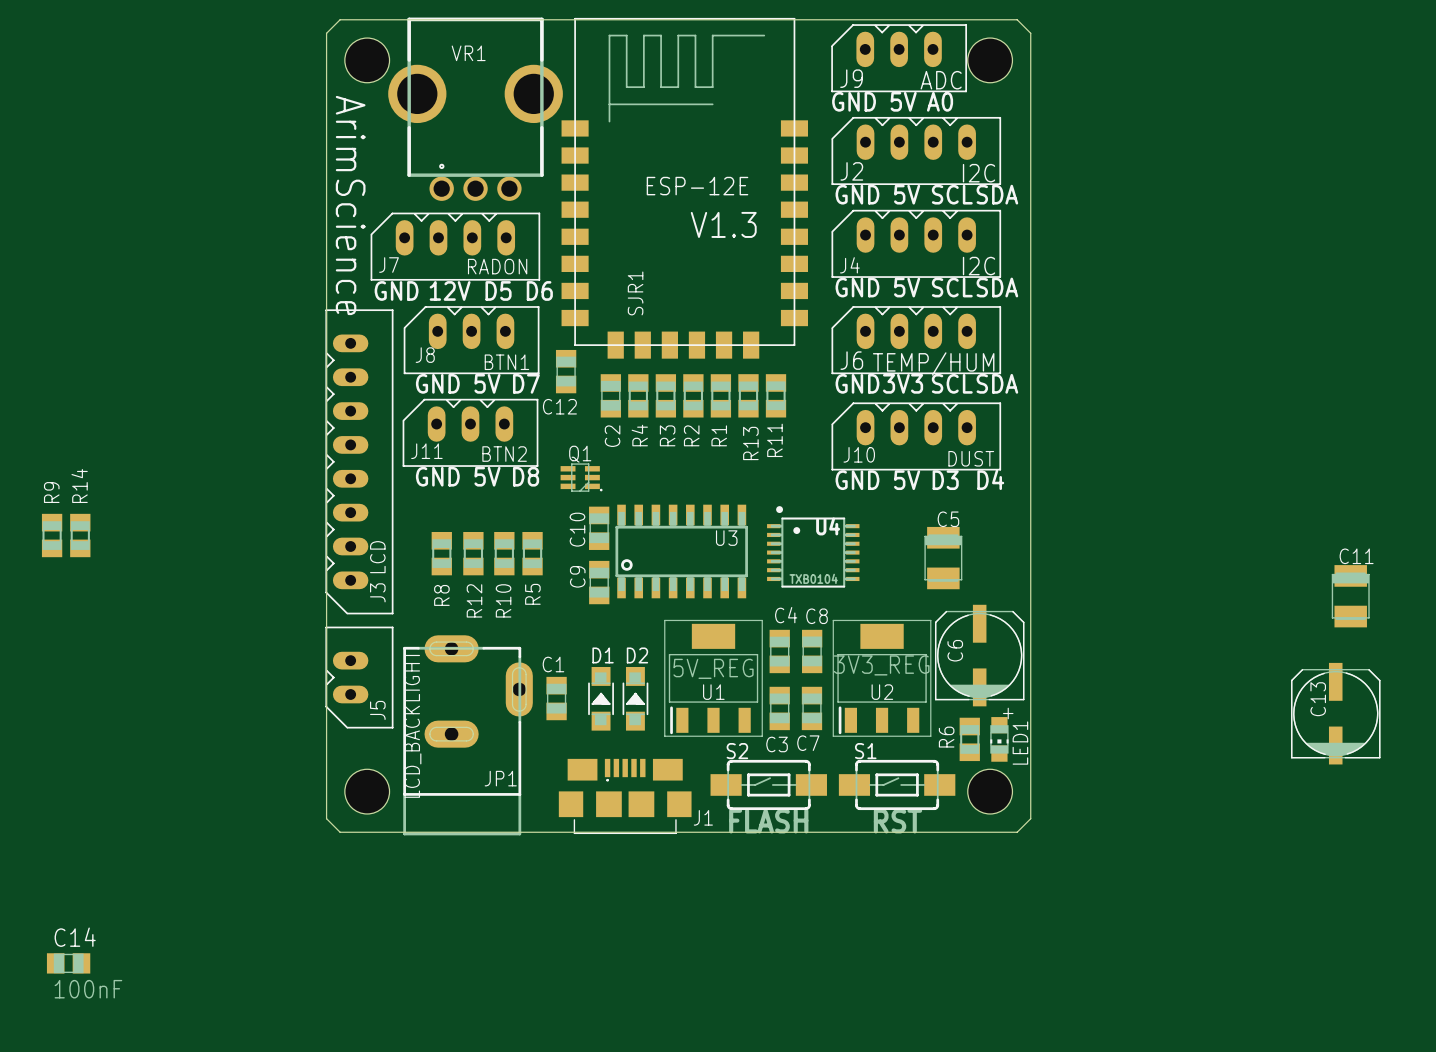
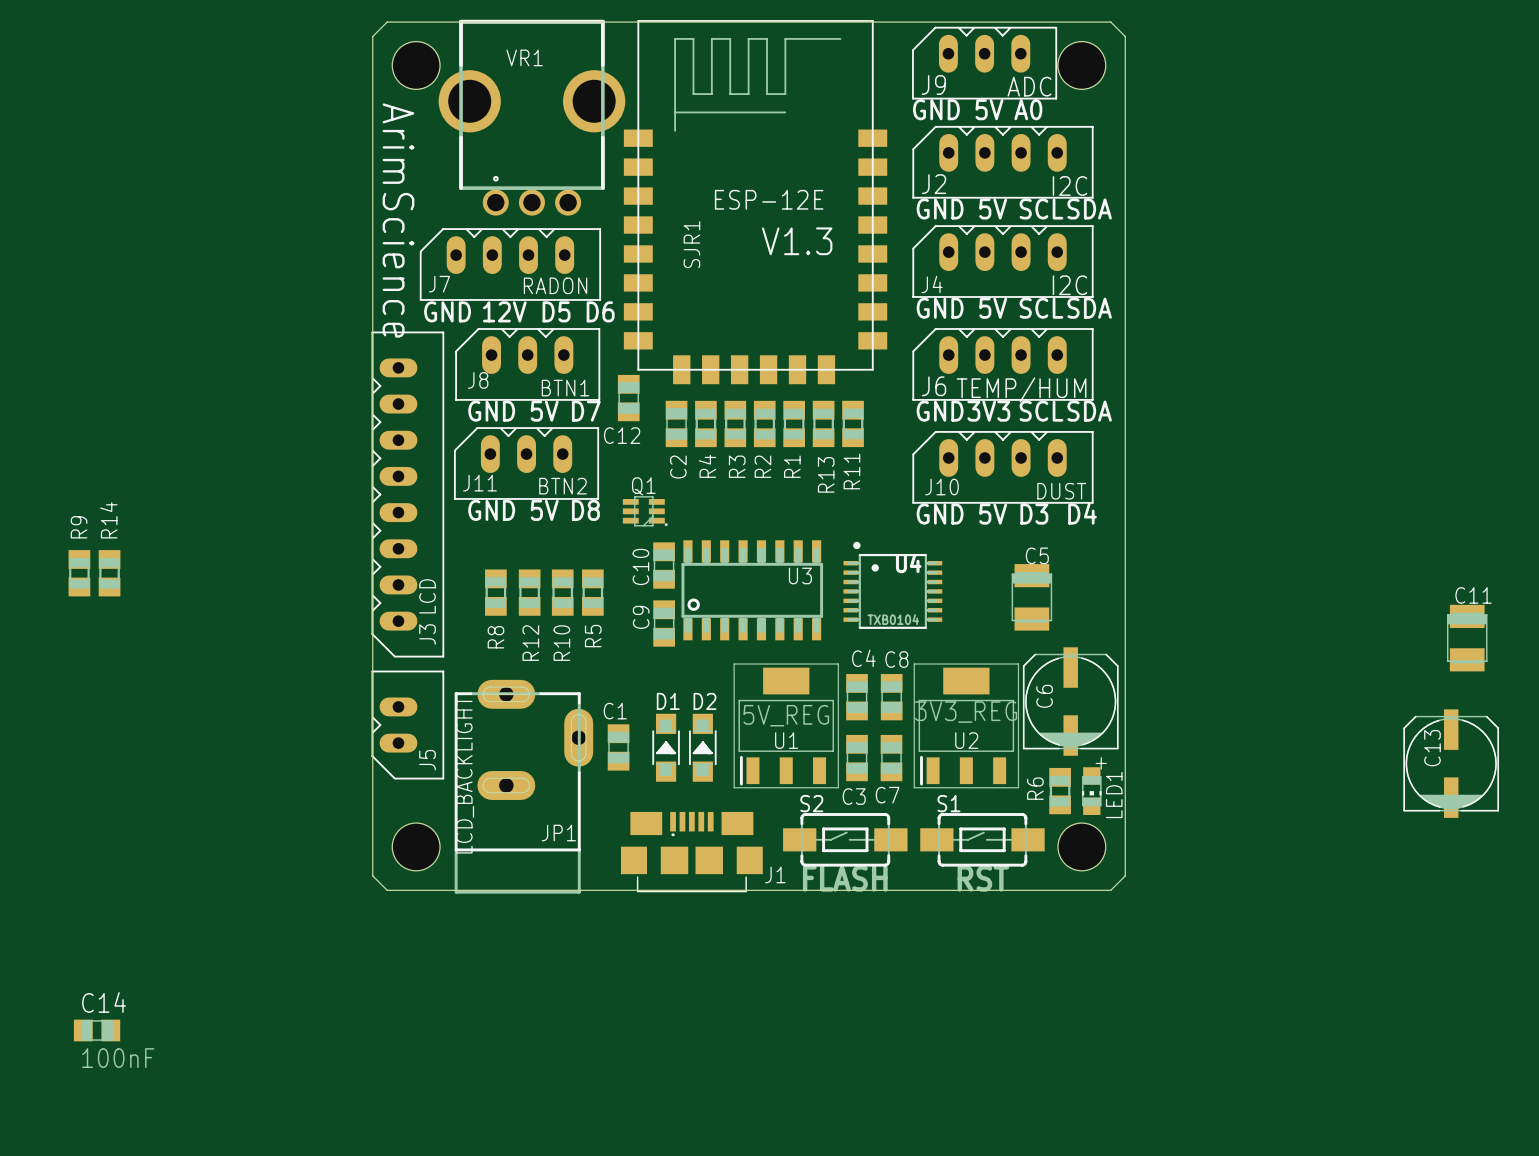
SJR1 name position: SJR1 (635, 293) -> SJR1 (691, 244)

